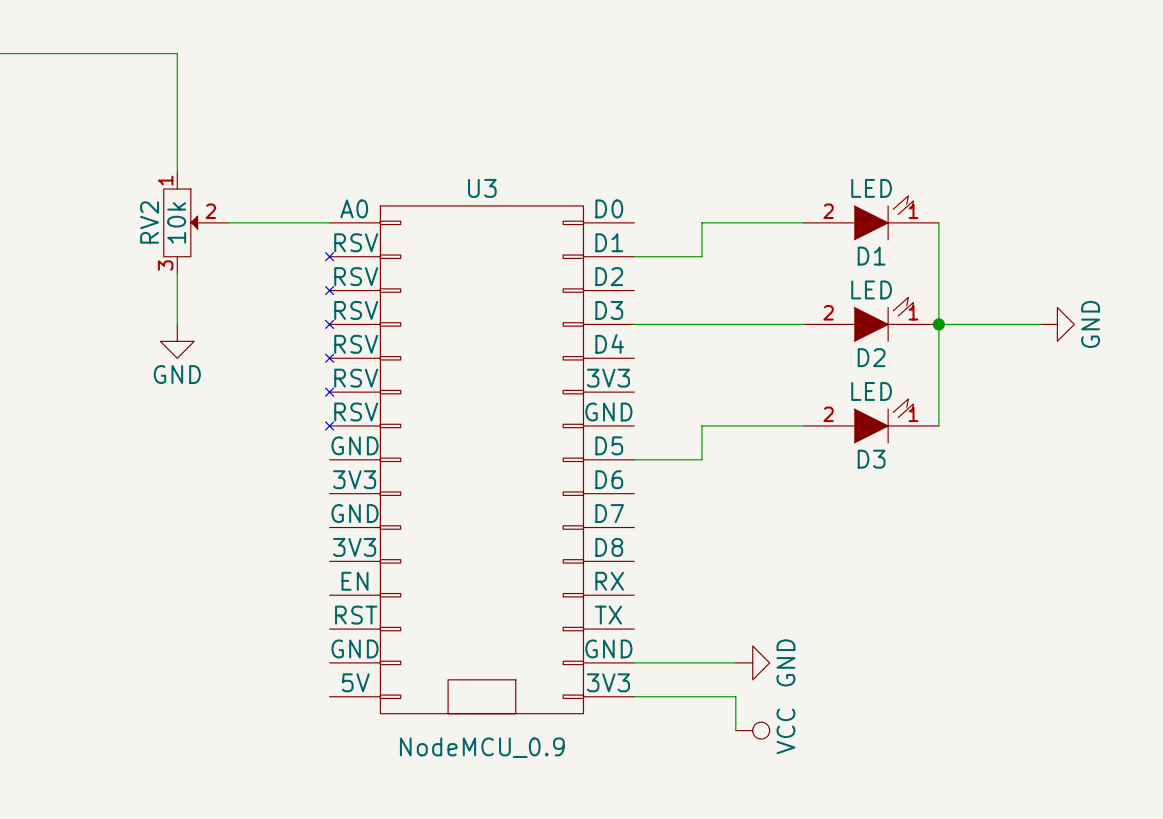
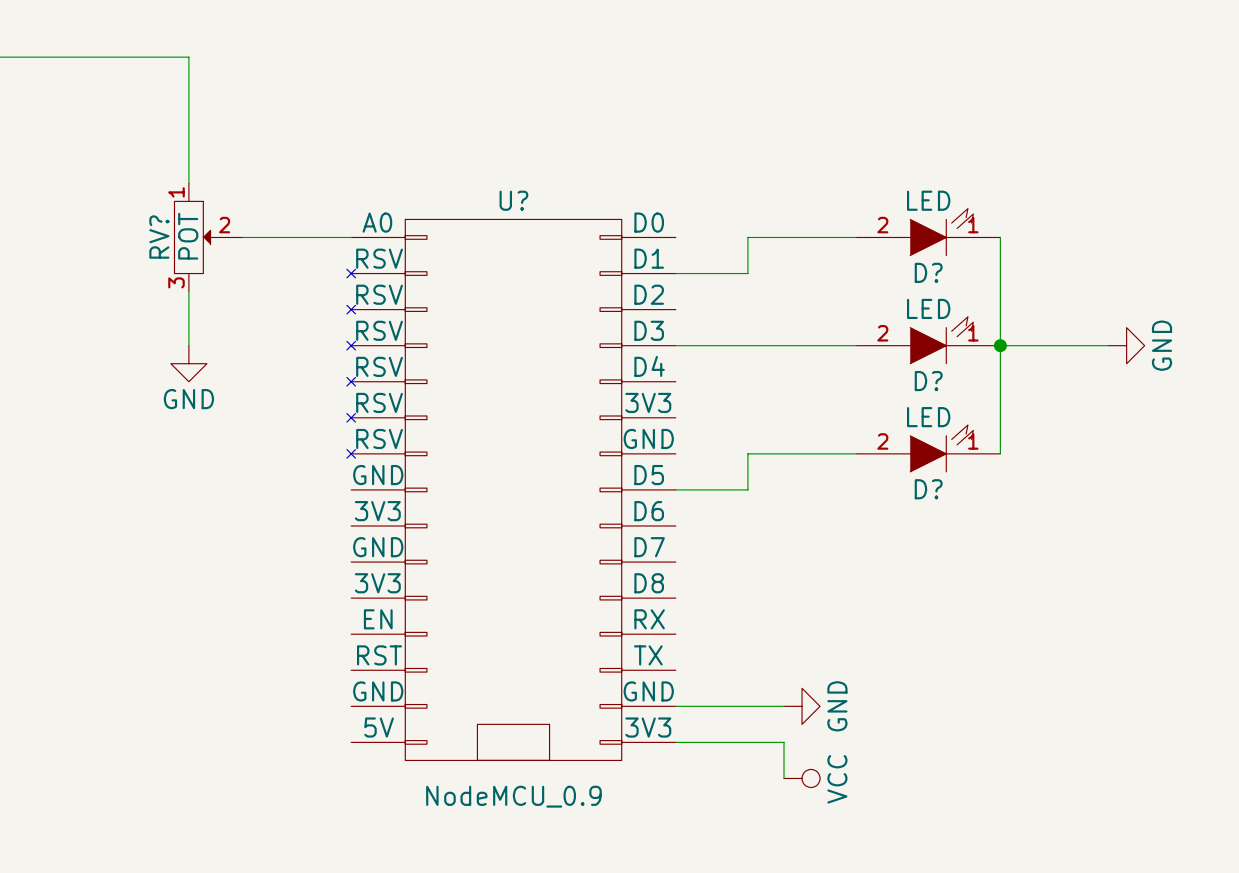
U3 name: U3 (482, 188) -> U? (513, 200)
RV2 name: RV2 (149, 222) -> RV? (159, 237)
RV2 value: 10k (176, 222) -> POT (188, 236)
D1 name: D1 (871, 256) -> D? (928, 272)
D2 name: D2 (871, 357) -> D? (928, 381)
D3 name: D3 (871, 459) -> D? (928, 489)

